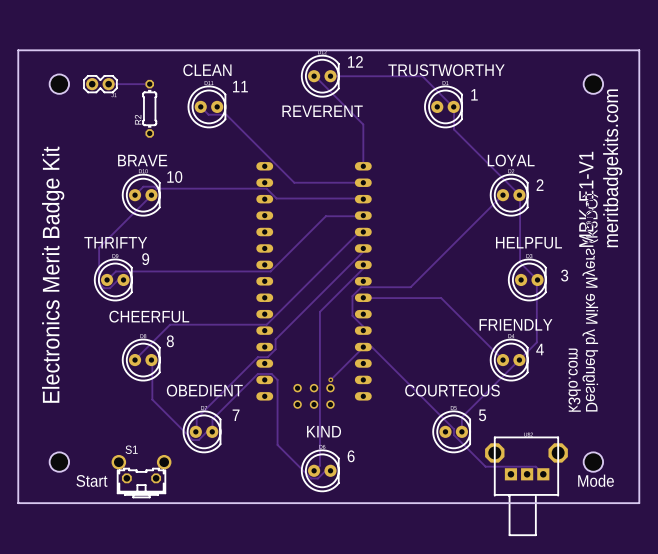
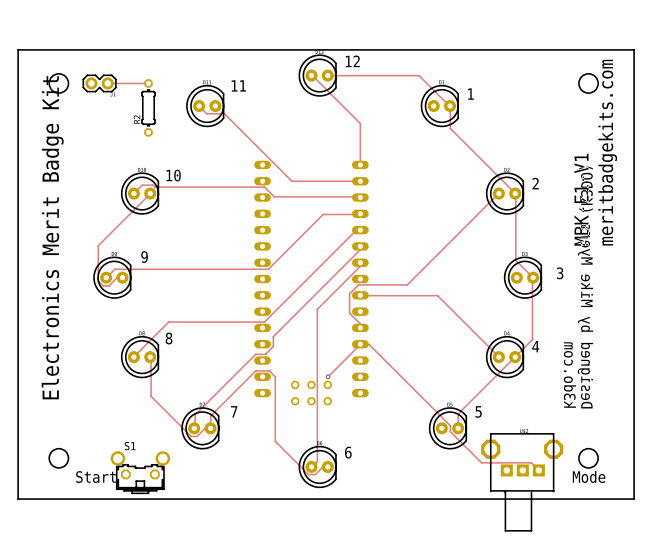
text: CLEAN (207, 70) -> none
text: TRUSTWORTHY (446, 70) -> none
text: REVERENT (322, 111) -> none
text: BRAVE (142, 160) -> none
text: LOYAL (511, 160) -> none
text: THRIFTY (115, 242) -> none
text: HELPFUL (529, 242) -> none
text: CHEERFUL (149, 316) -> none
text: FRIENDLY (516, 324) -> none
text: OBEDIENT (204, 390) -> none
text: COURTEOUS (452, 390) -> none
text: KIND (324, 431) -> none

